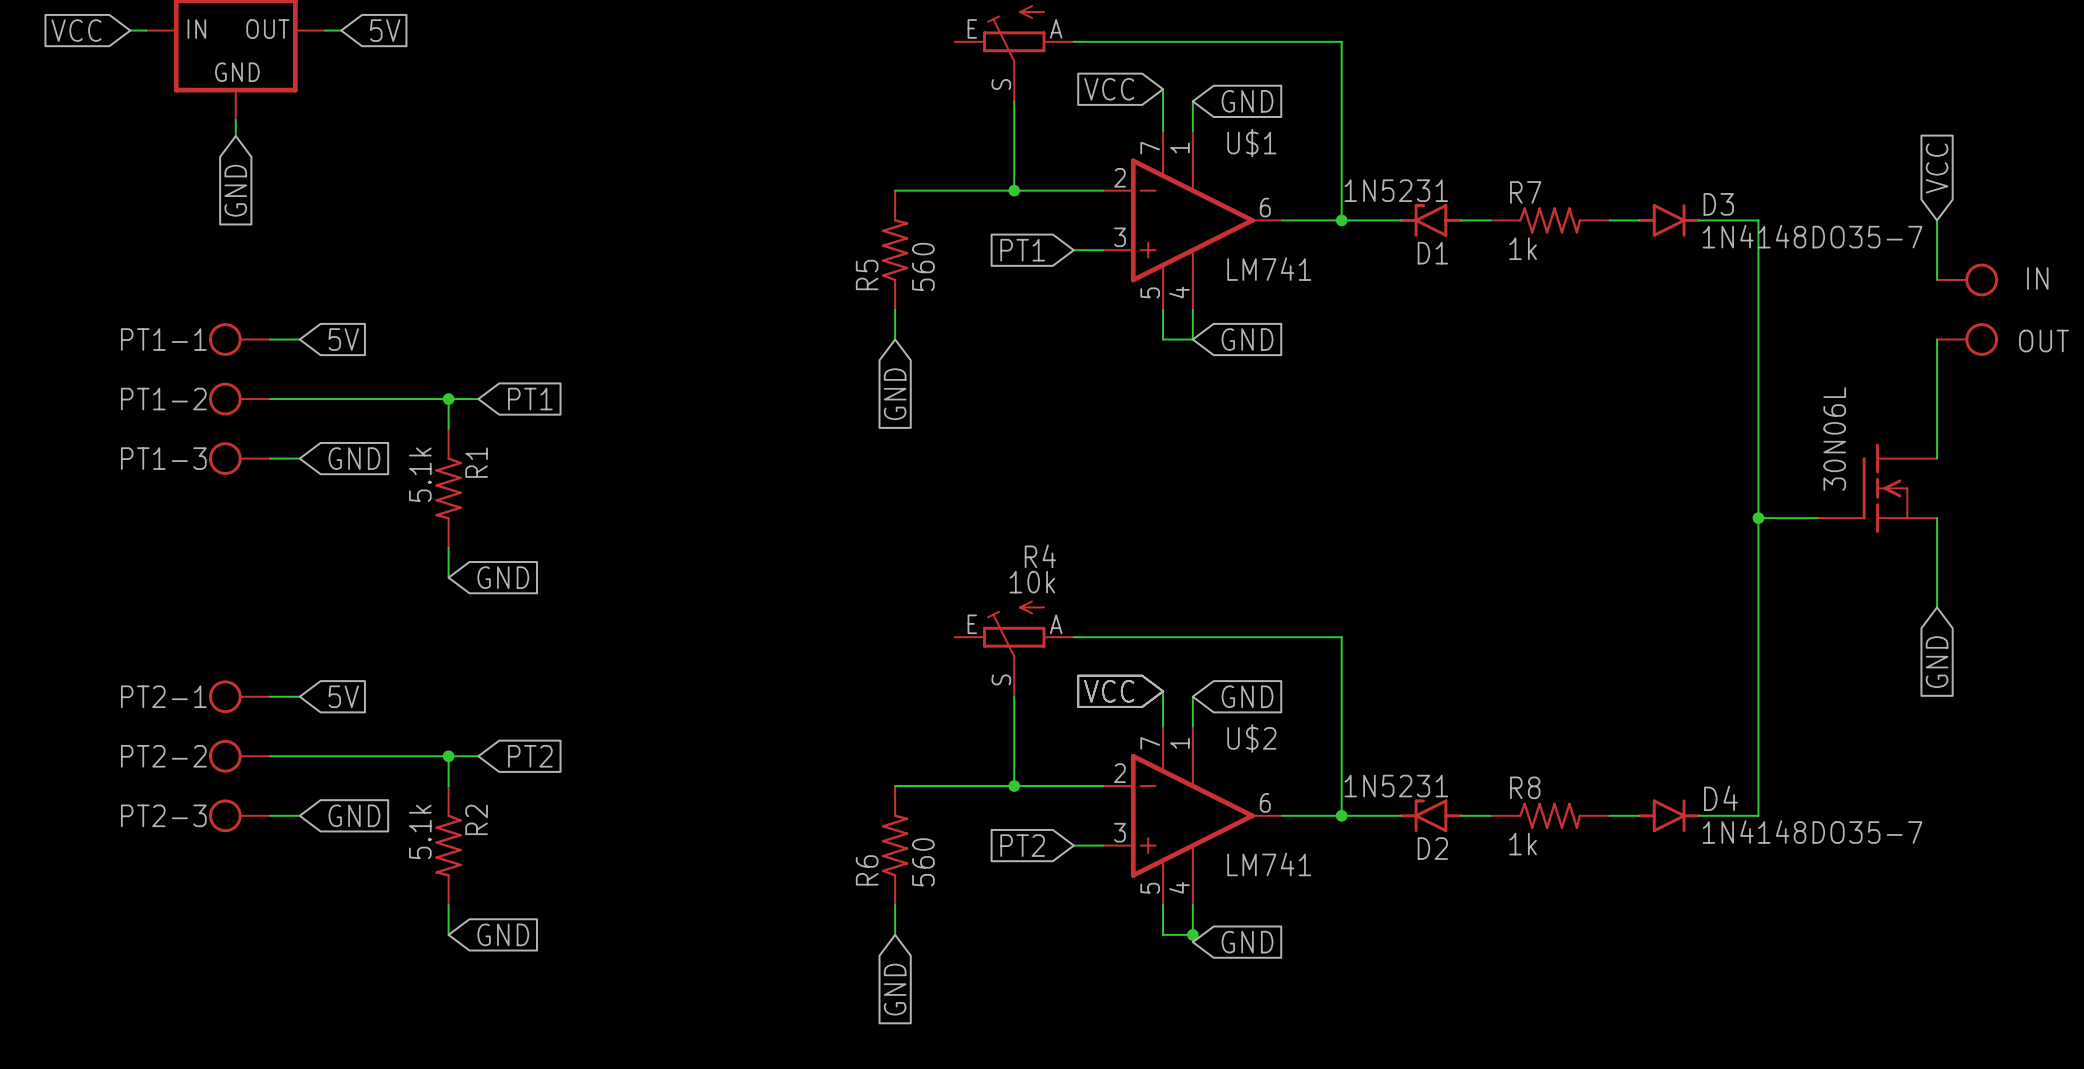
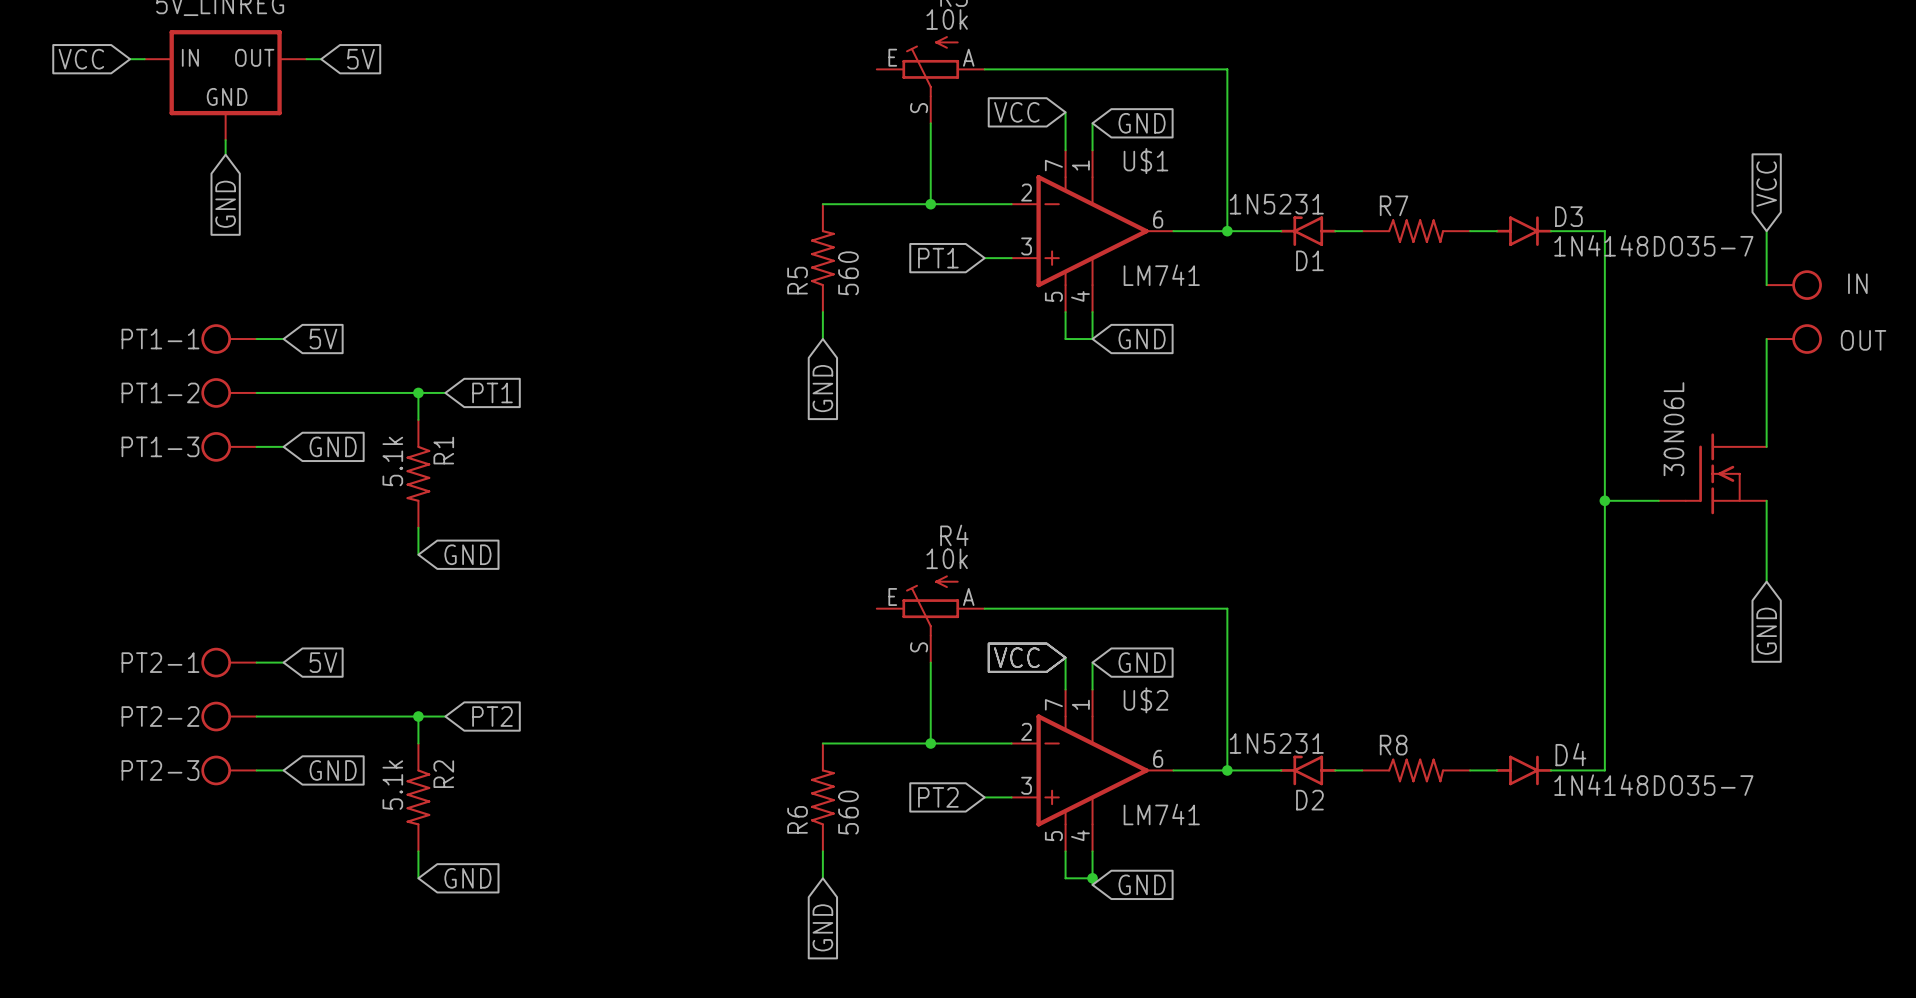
R7 value: 1k (1523, 248) -> none
R8 value: 1k (1523, 844) -> none

